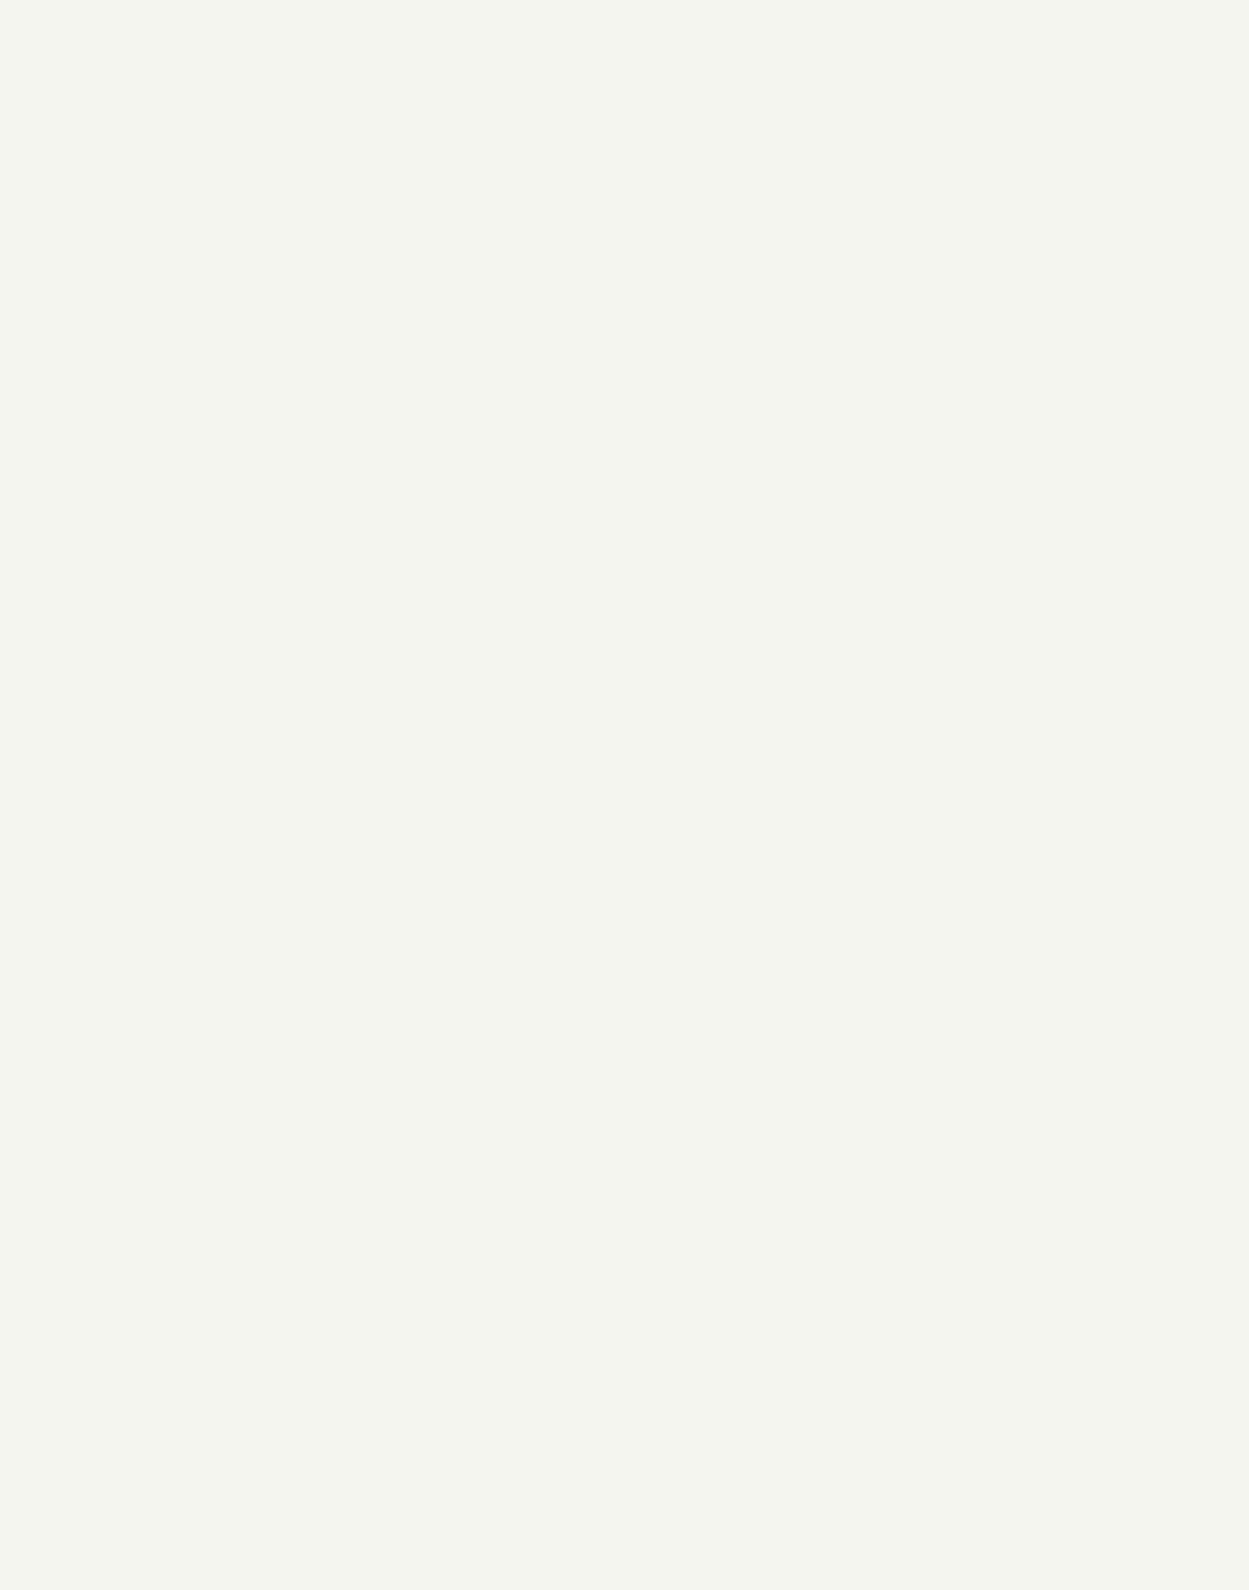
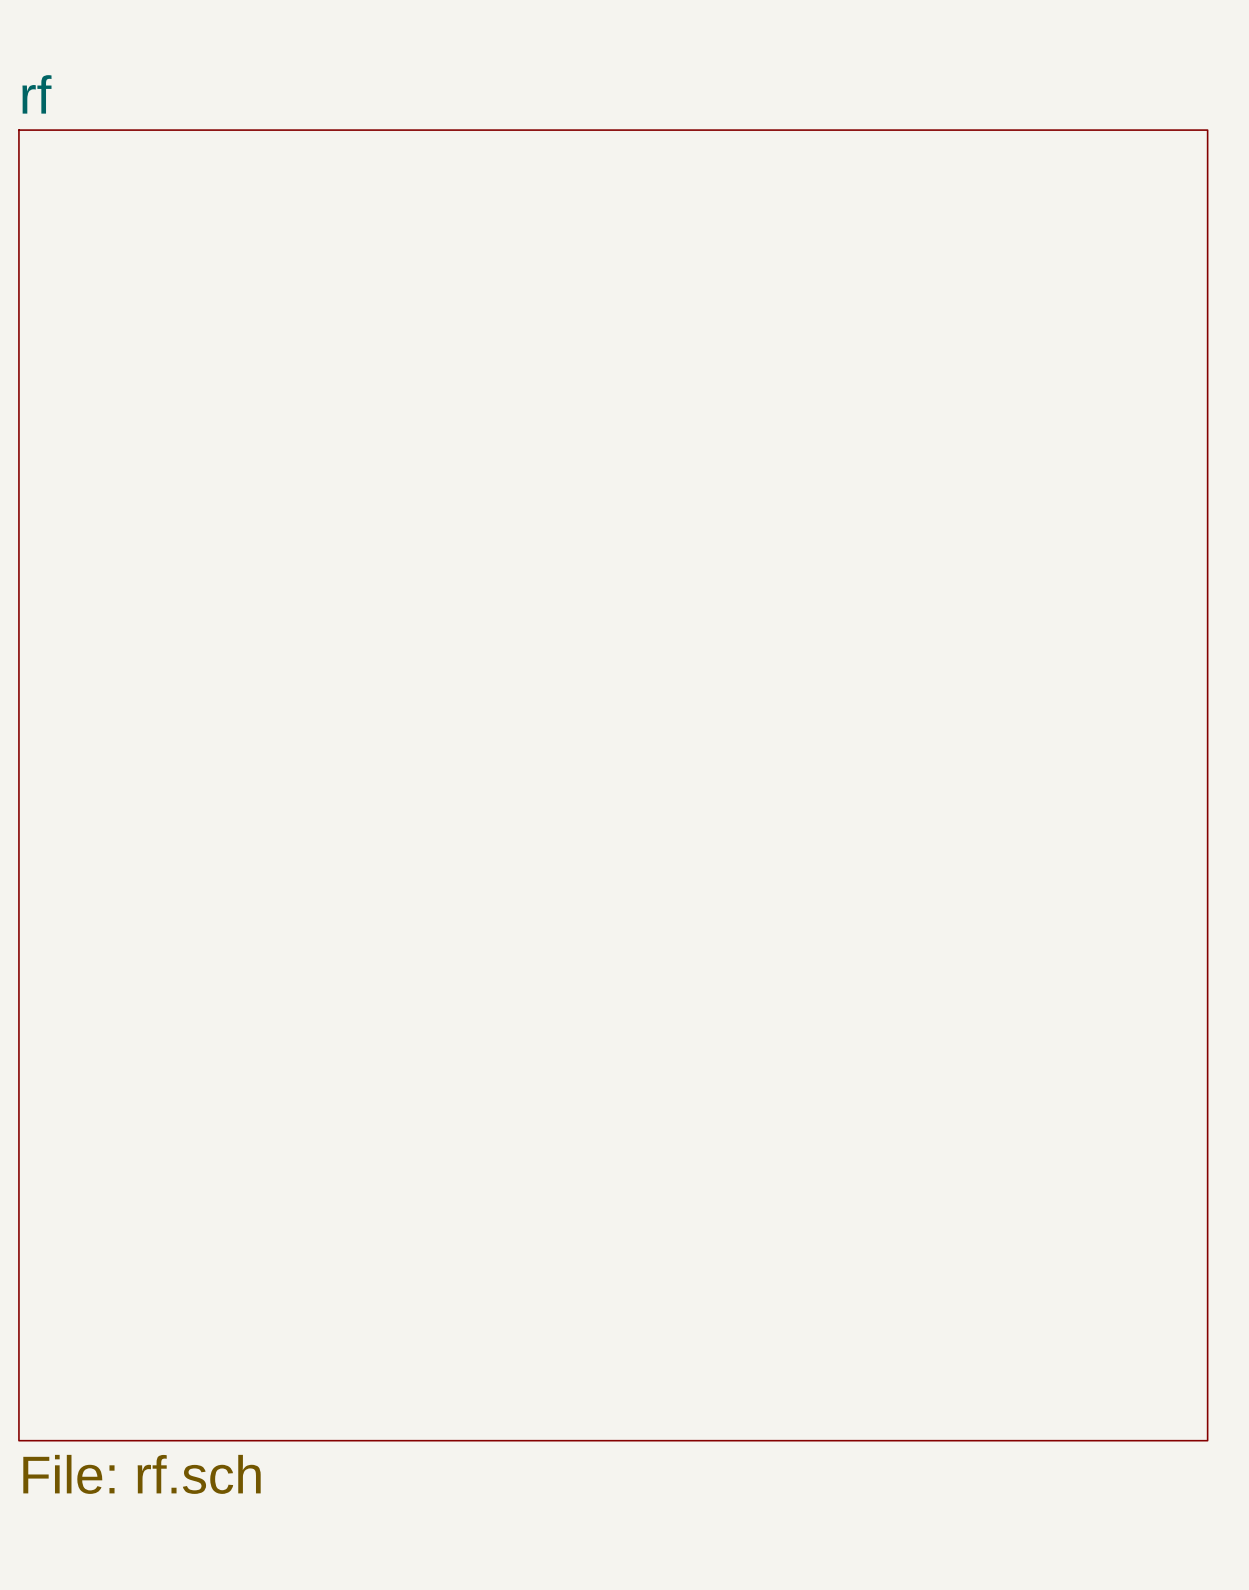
sheet rf: none -> File: rf.sch (613, 785)

